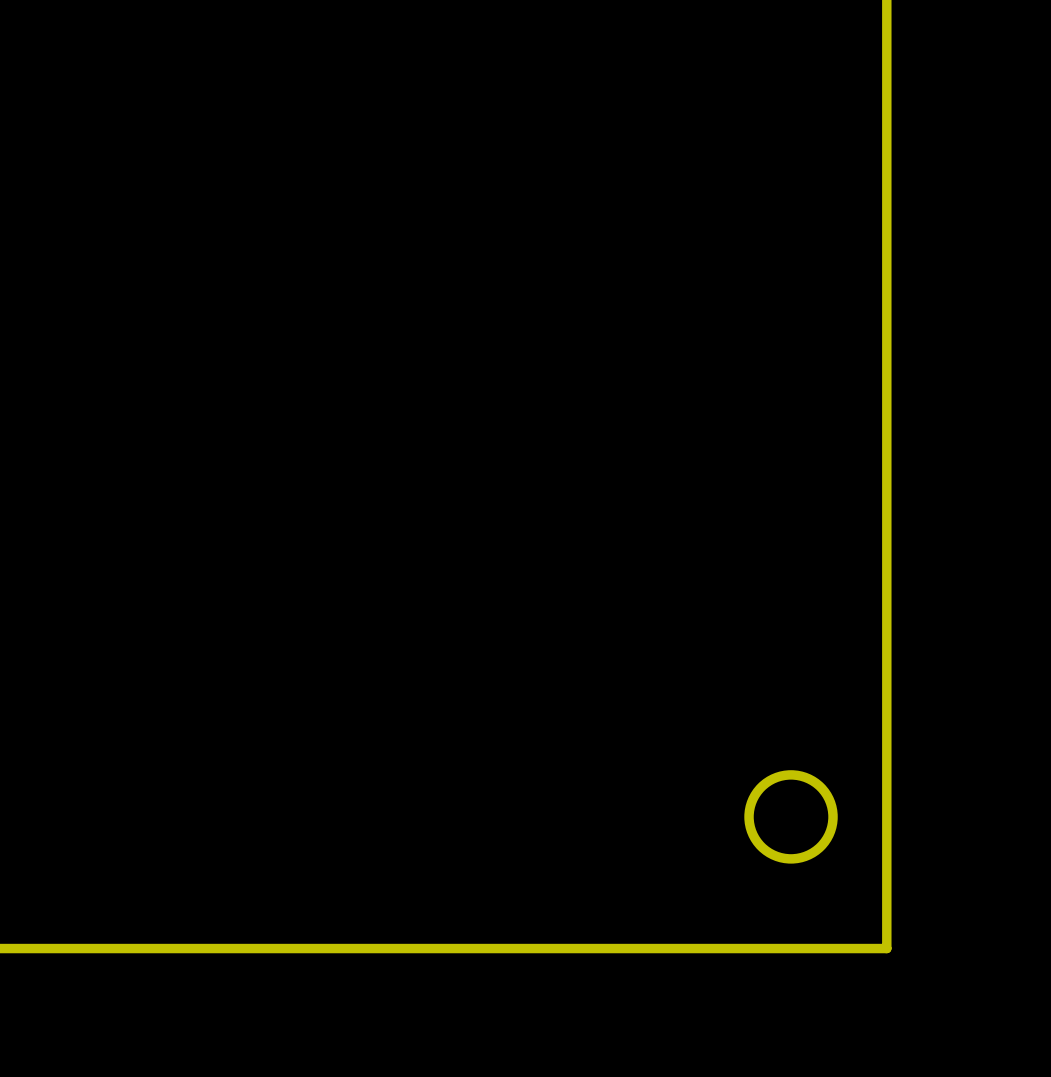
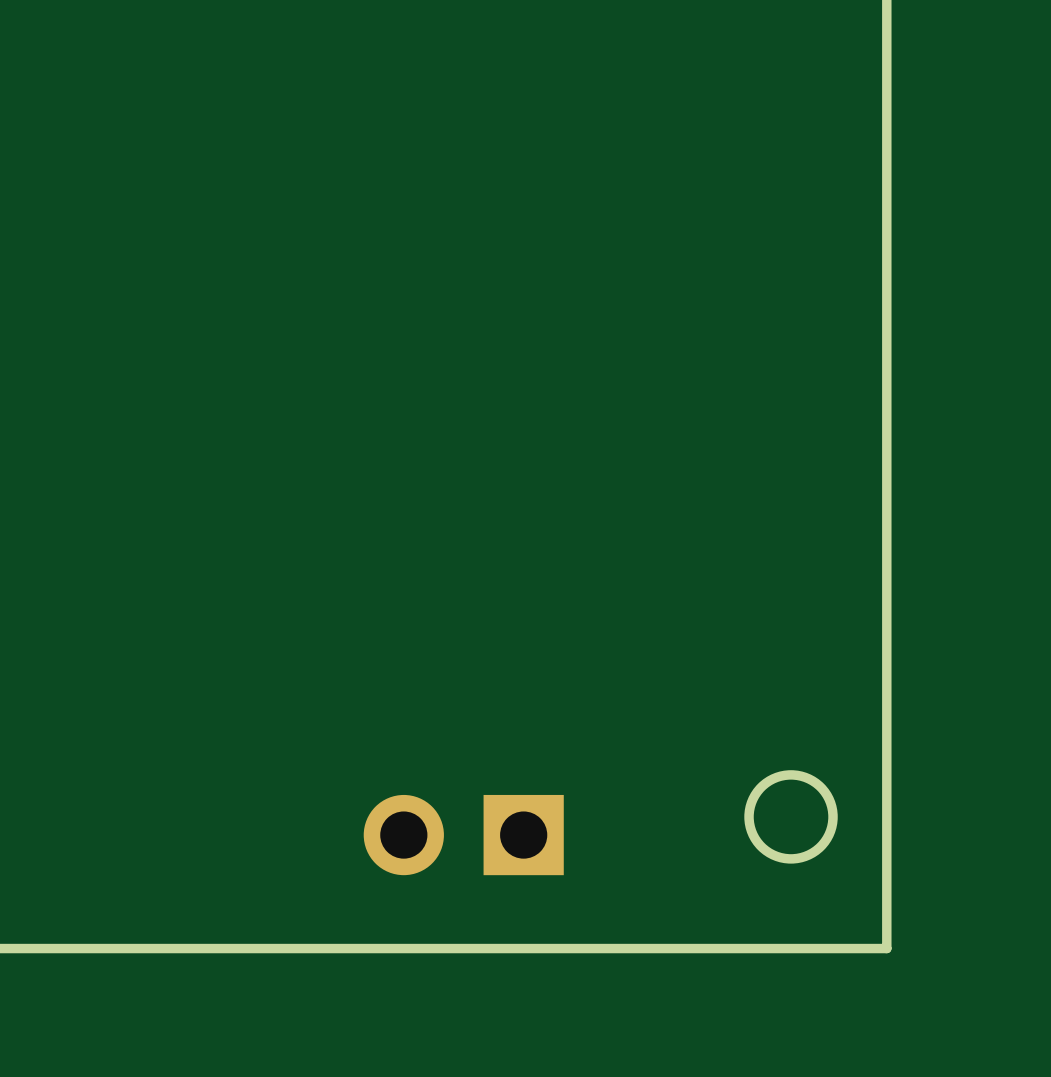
part: none -> (463, 835)

